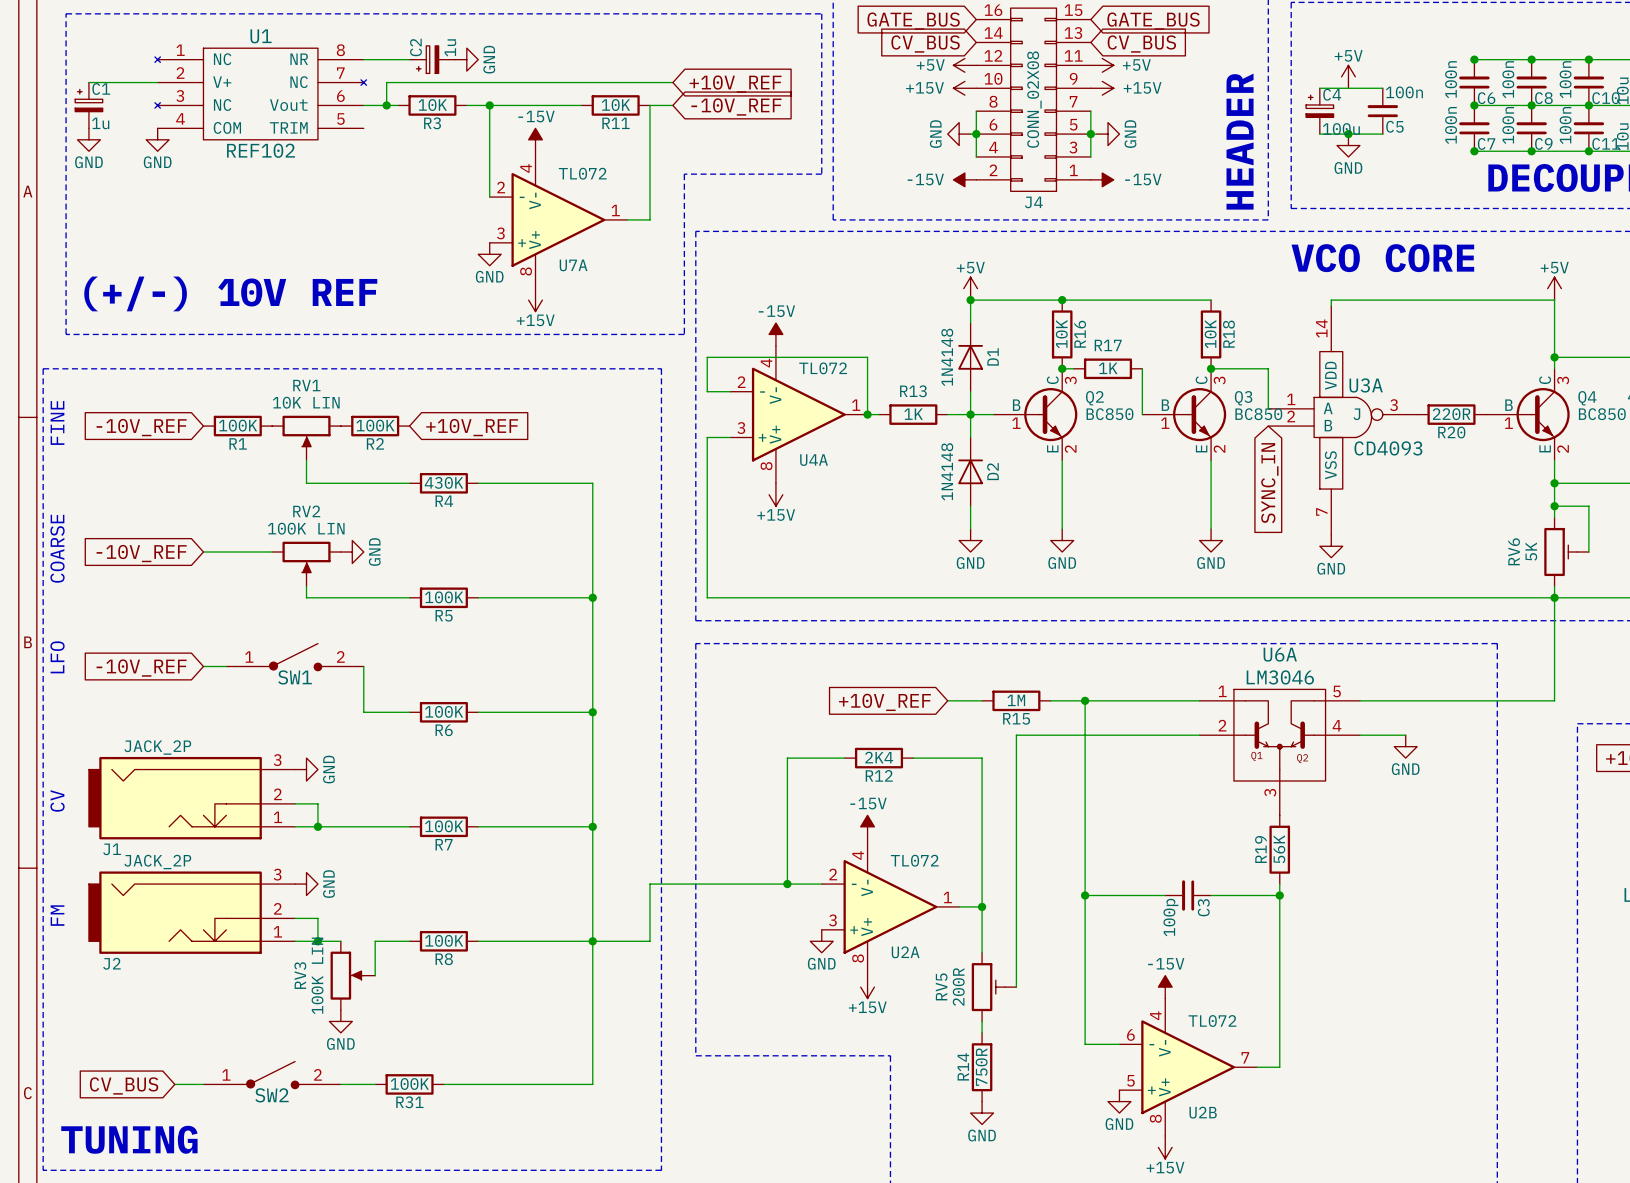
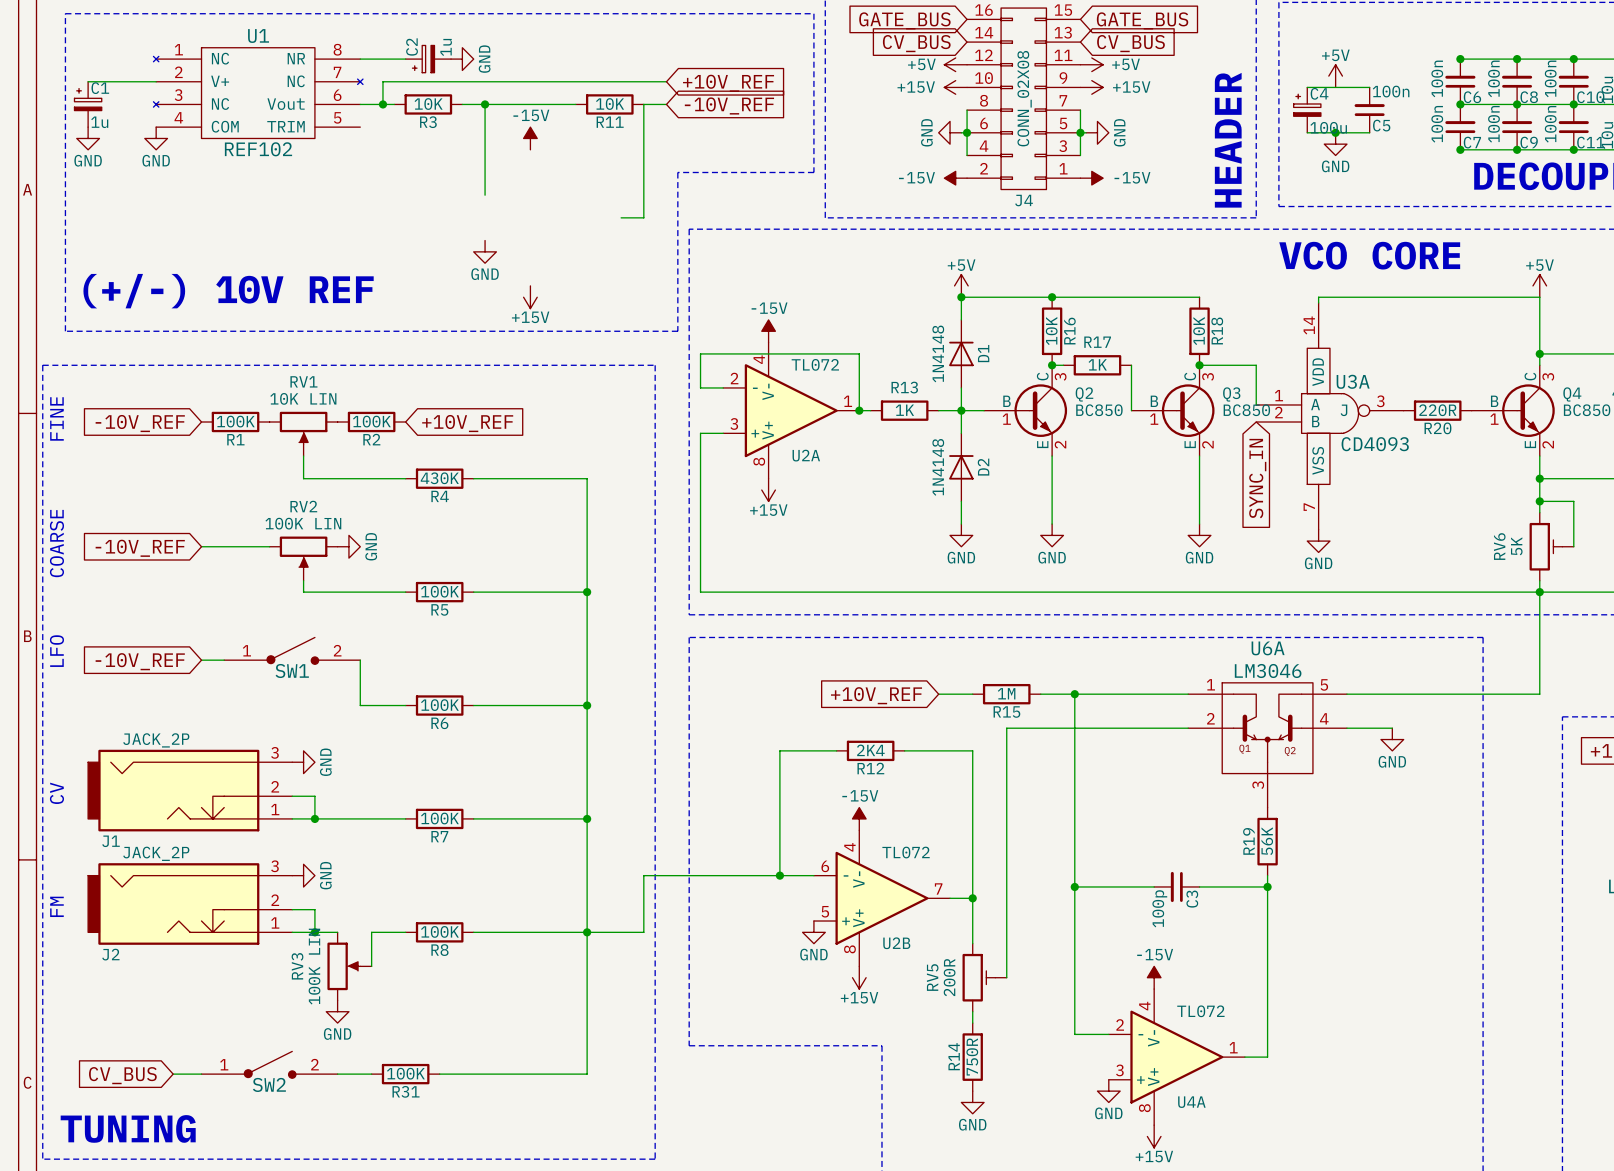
U7A: TL072 (558, 219) -> none
U4A name: U4A (814, 460) -> U2A (806, 455)
U2A: TL072 (890, 906) -> none
U2B position: (1188, 1067) -> (881, 898)
U4A: none -> TL072 (1176, 1057)

